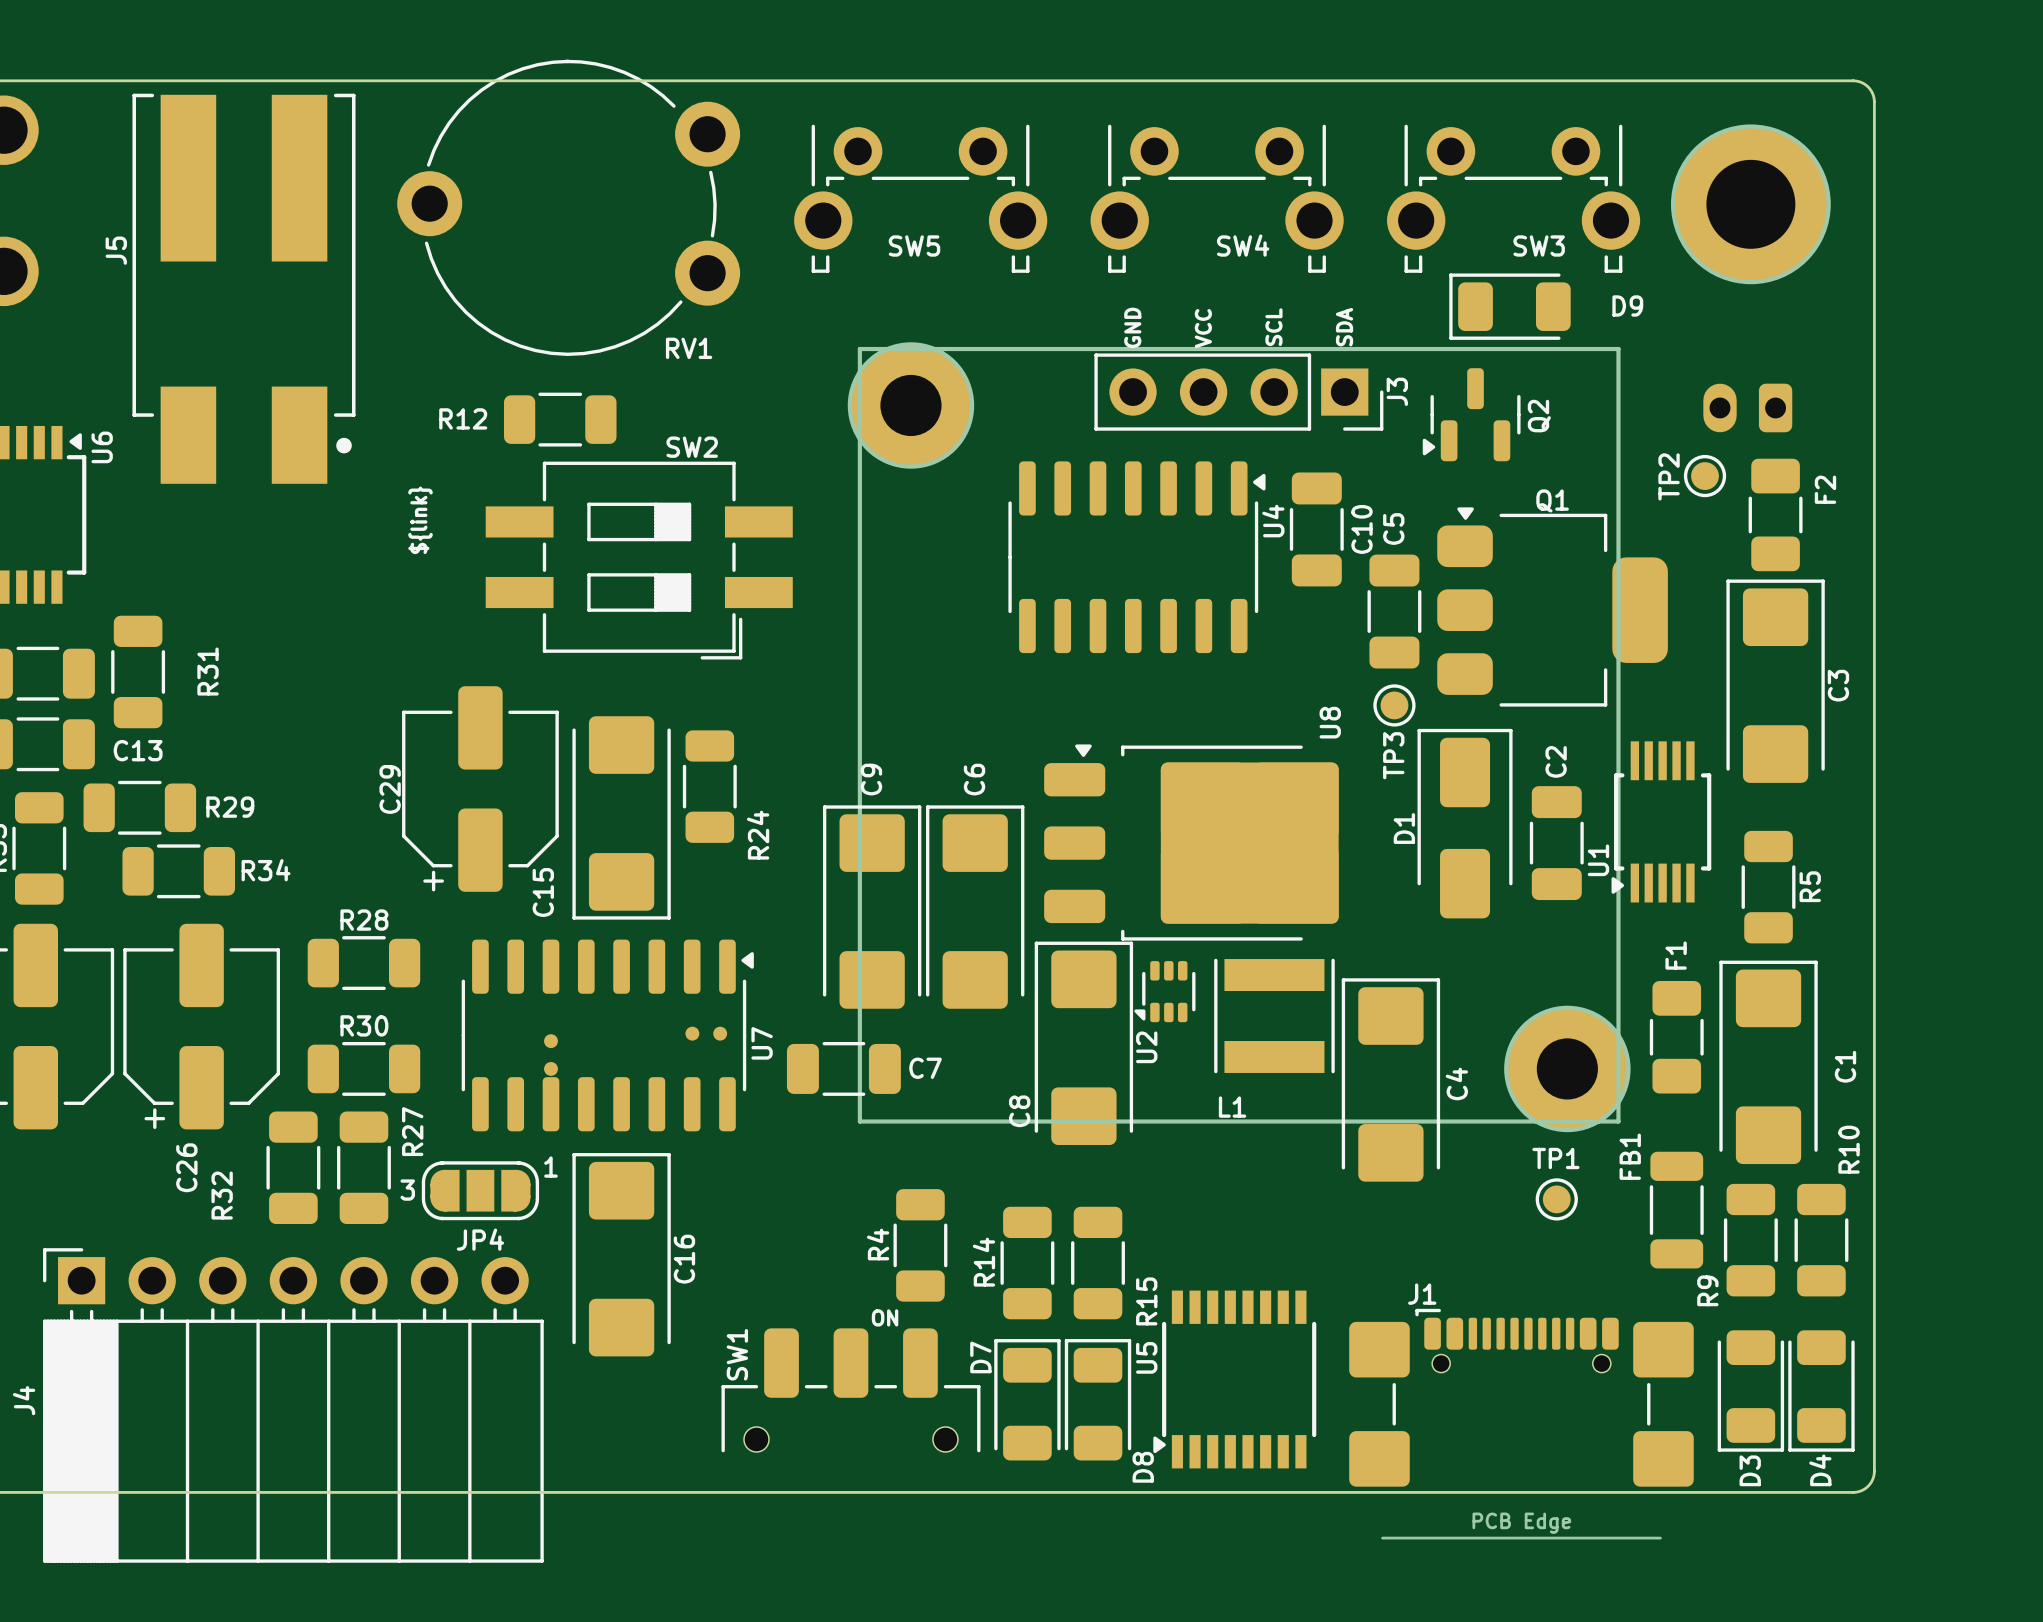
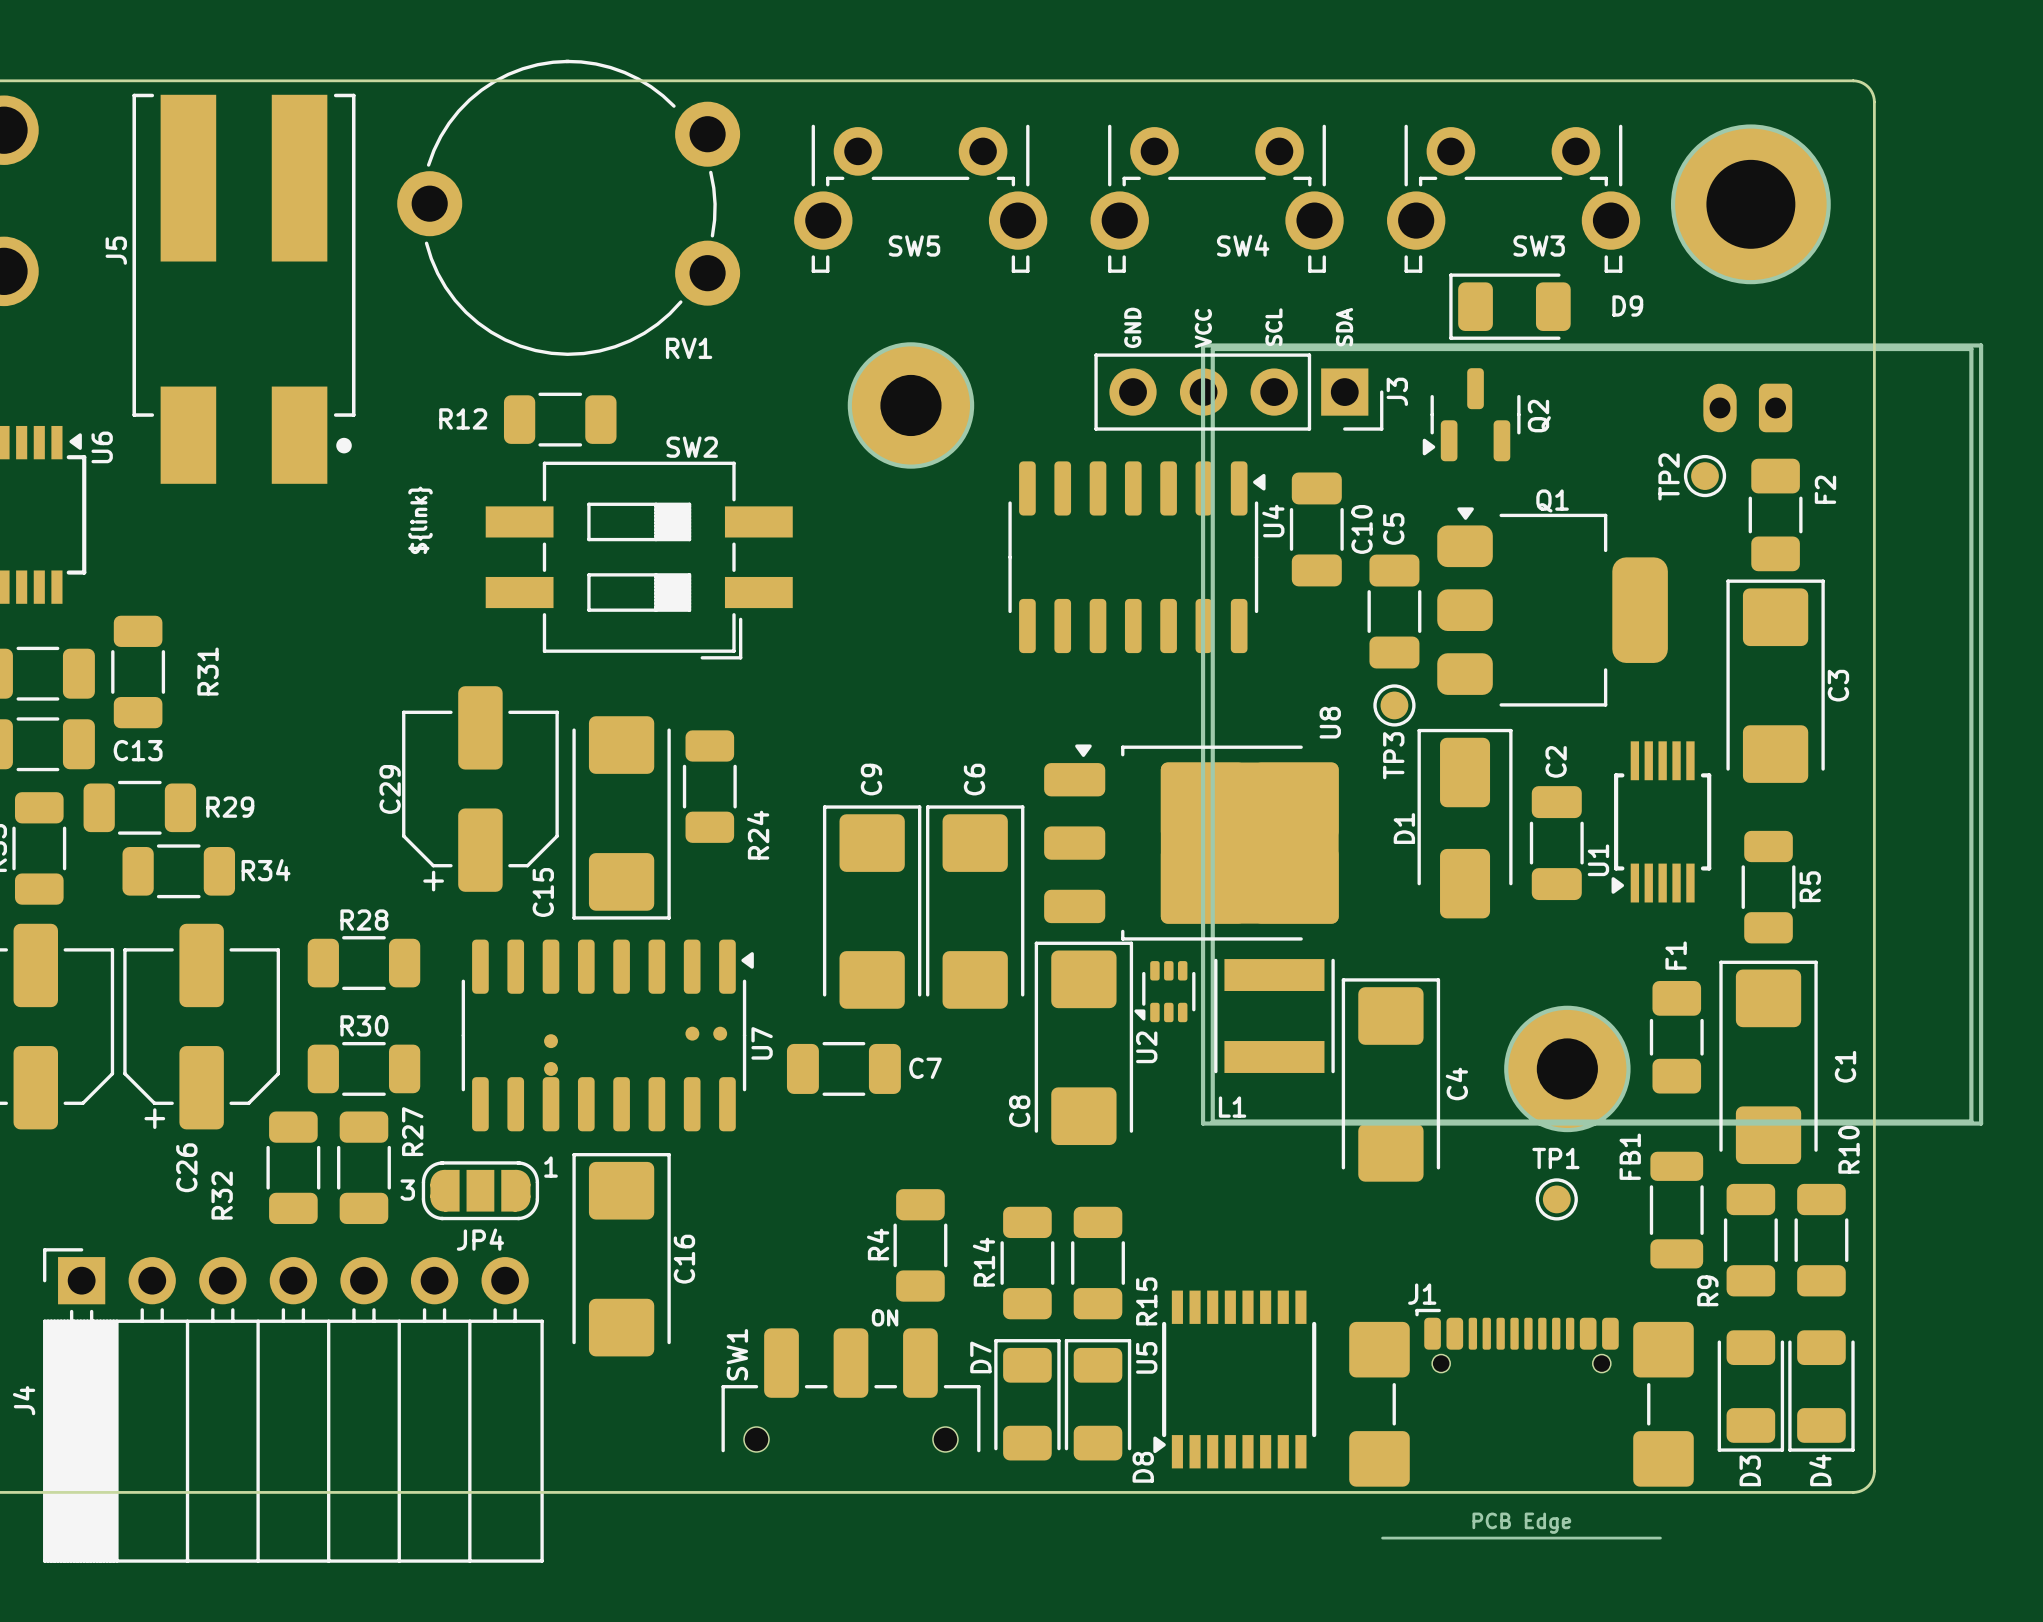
line: none -> (1203, 345) (1981, 345) (1981, 1123) (1203, 1123) (1203, 345)
line: (1212, 349) (859, 349) (859, 1121) (1212, 1121) -> (1212, 349) (1212, 1121)
line: (1618, 349) (1618, 1121) -> (1618, 349) (1971, 349) (1971, 1121) (1618, 1121)

